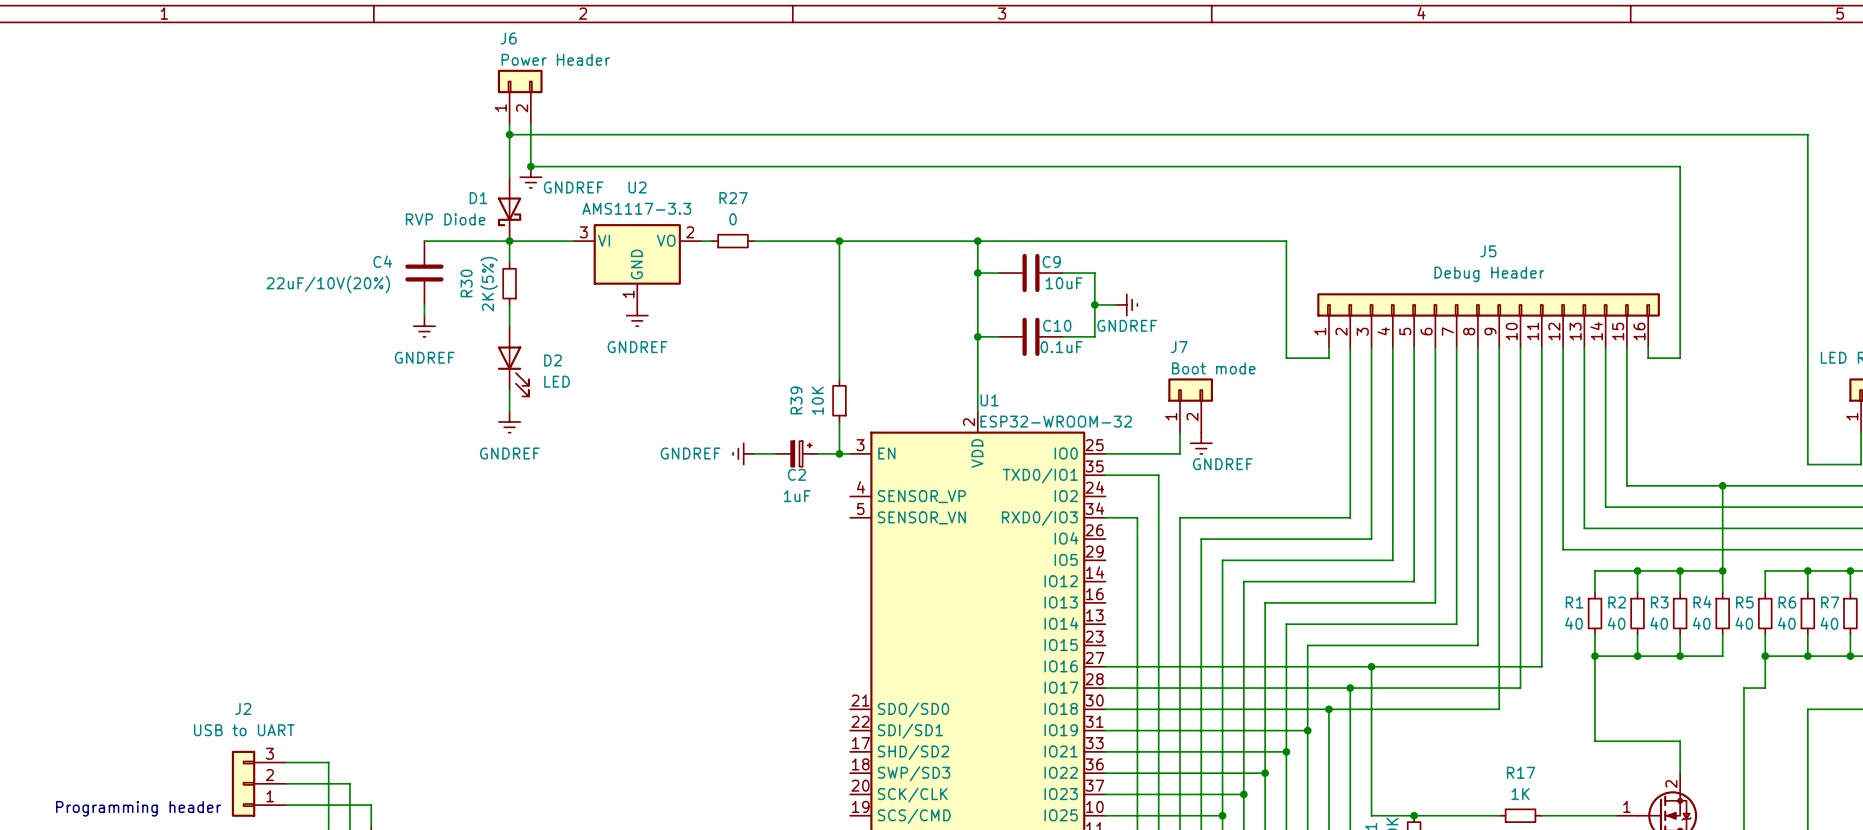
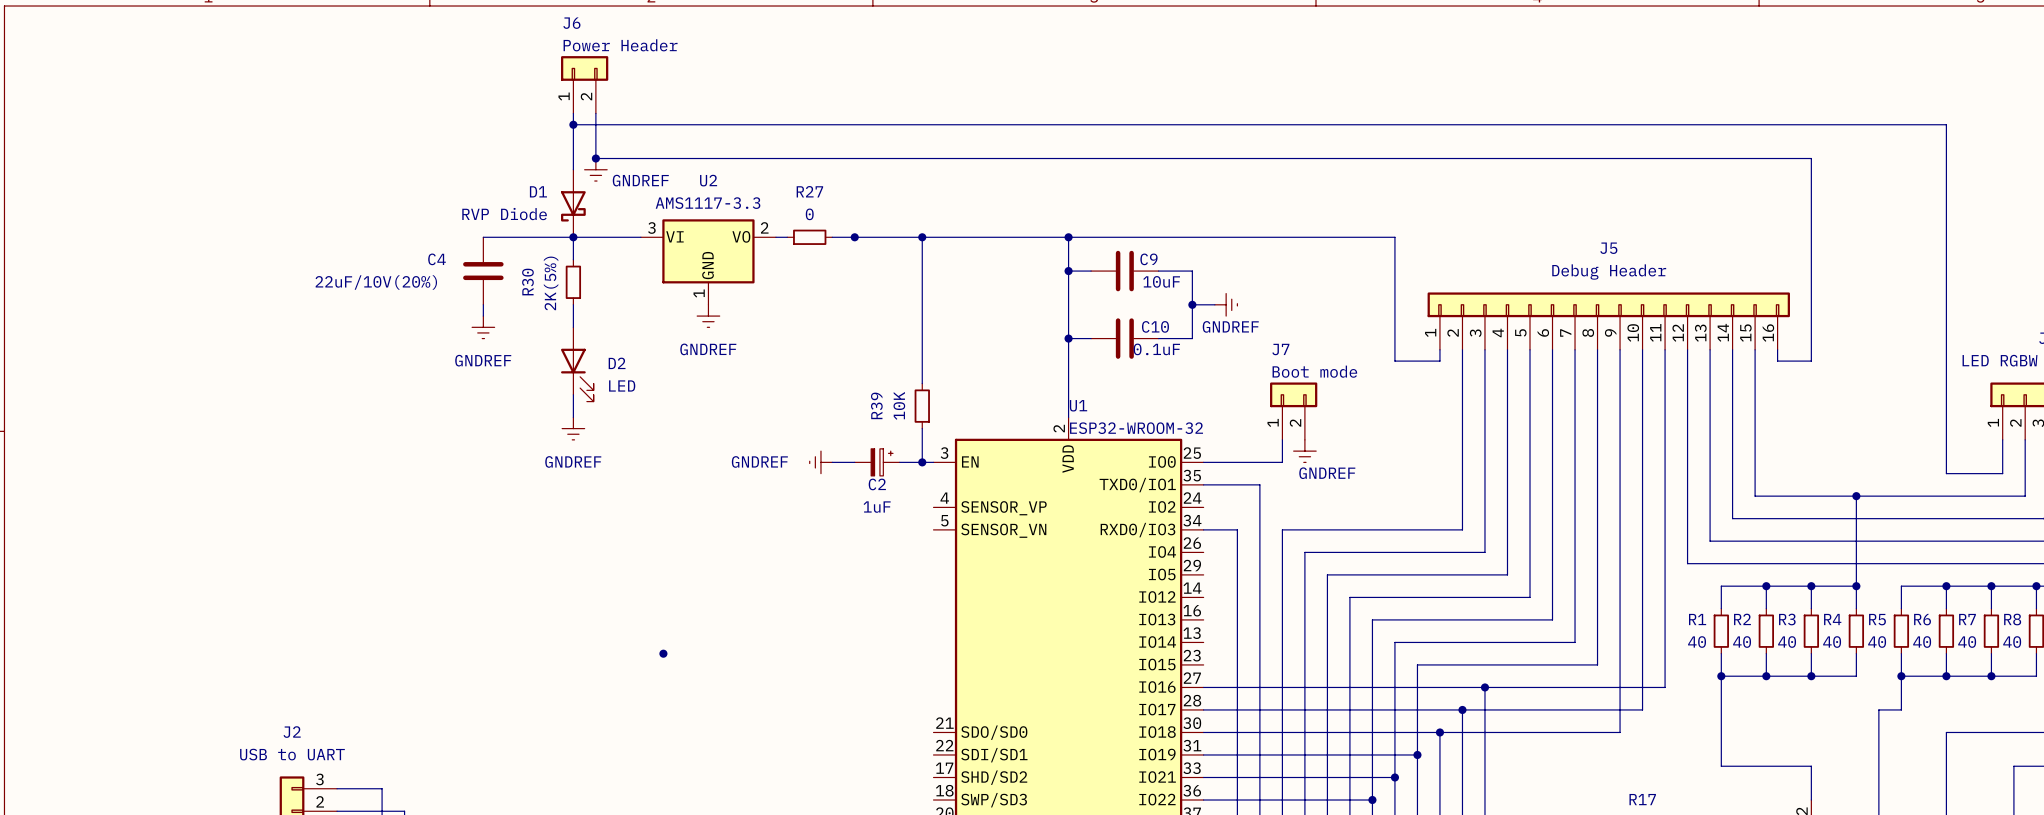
junction: none -> (854, 237)
junction: none -> (663, 653)

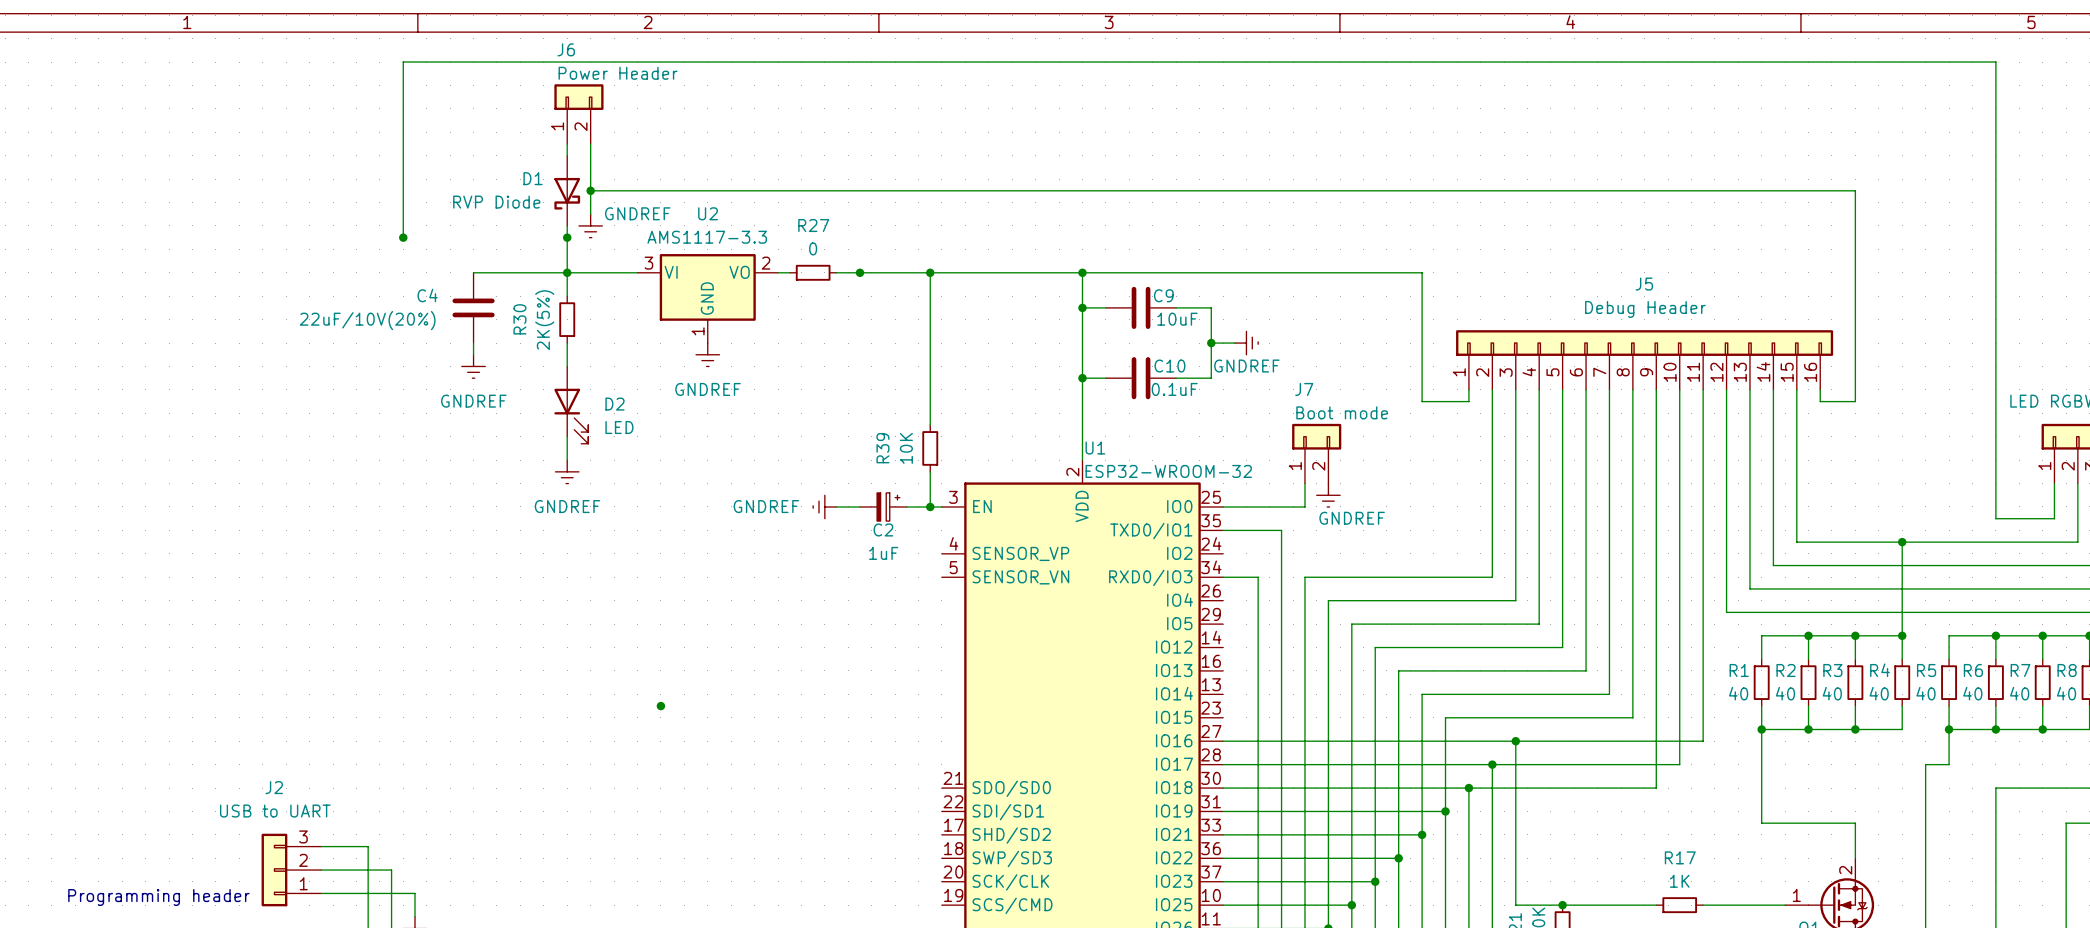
junction: (573, 124) -> none
wire: (1946, 124) (573, 124) (573, 169) -> (1995, 155) (1995, 62) (403, 62) (403, 237)
power symbol position: GNDREF (595, 169) -> GNDREF (590, 225)
junction: none -> (403, 237)
junction: none -> (567, 237)
D1 position: (573, 203) -> (567, 190)

